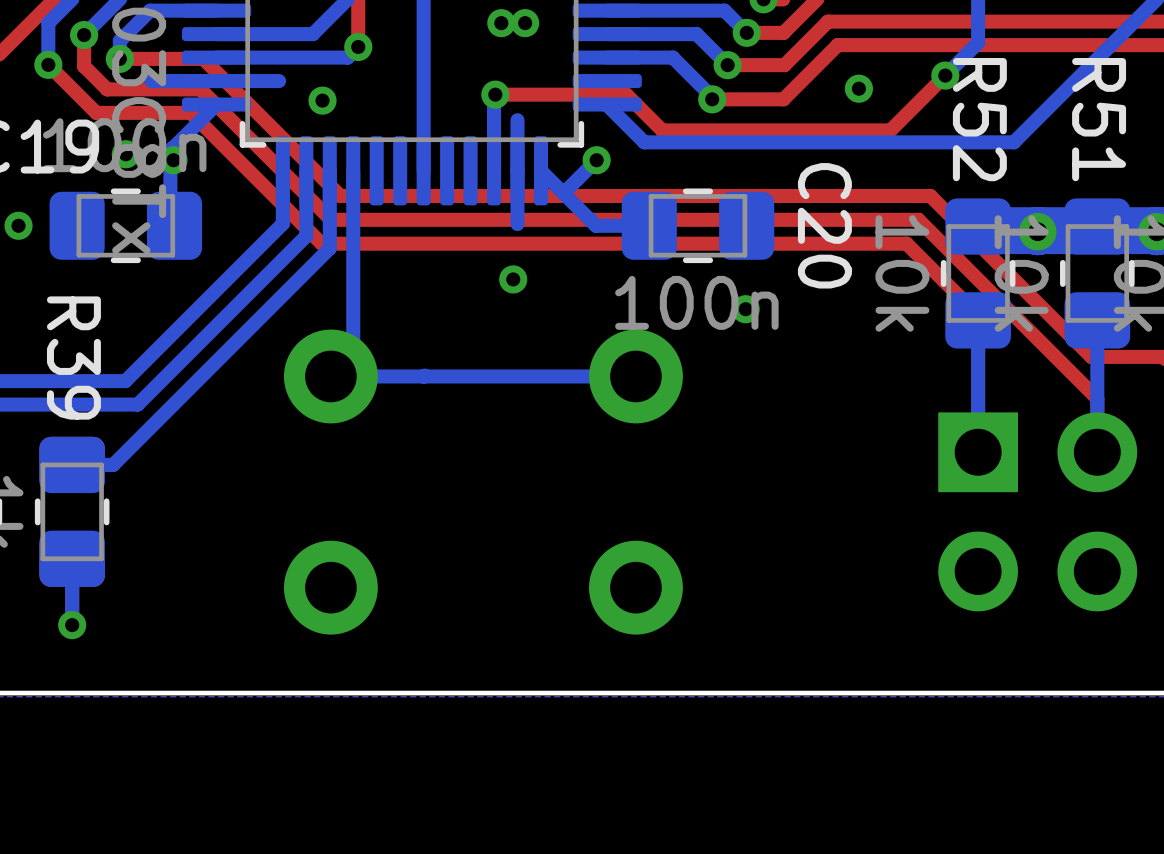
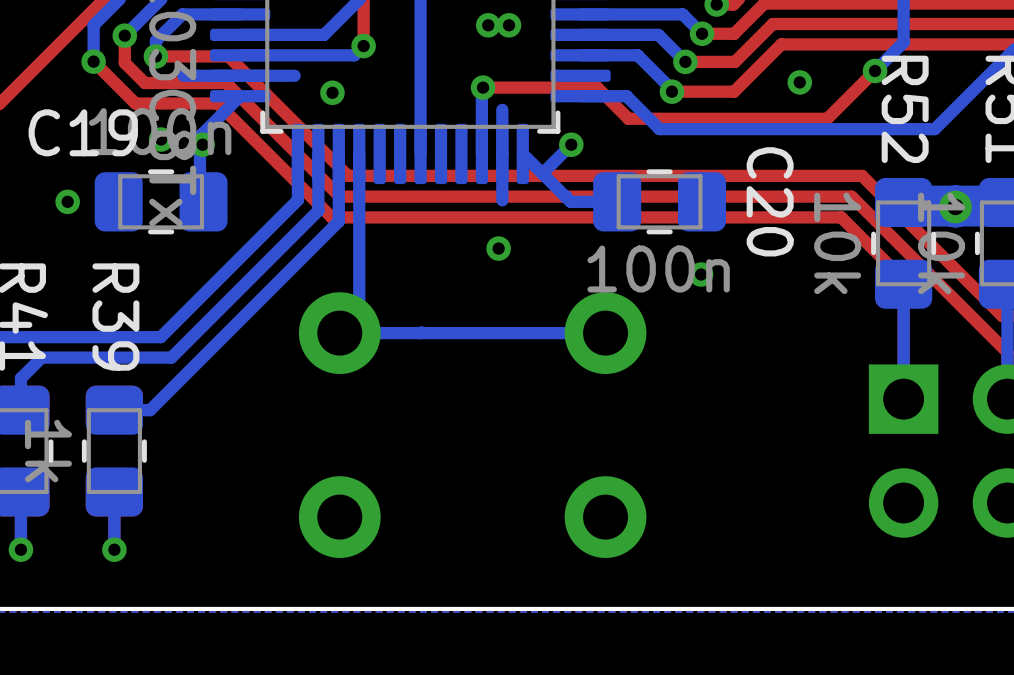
bottom track: (607, 105) (644, 142) (697, 142) -> (580, 96) (626, 96) (659, 129)

